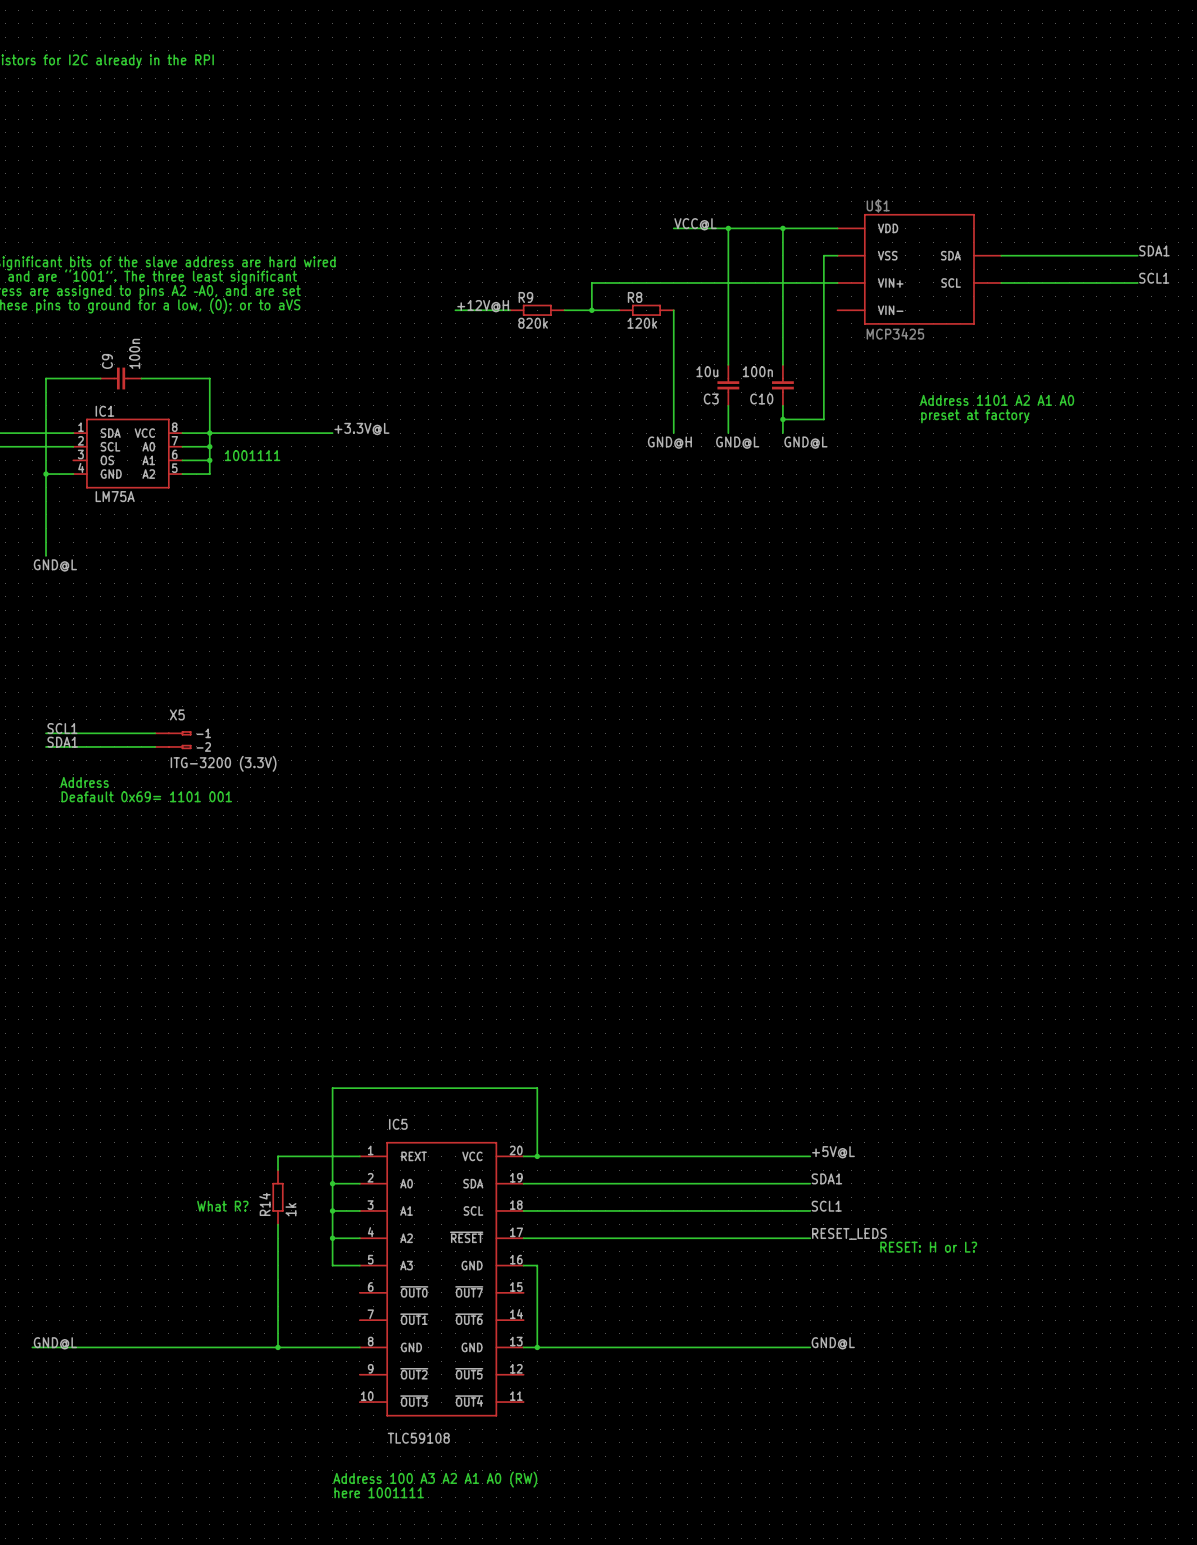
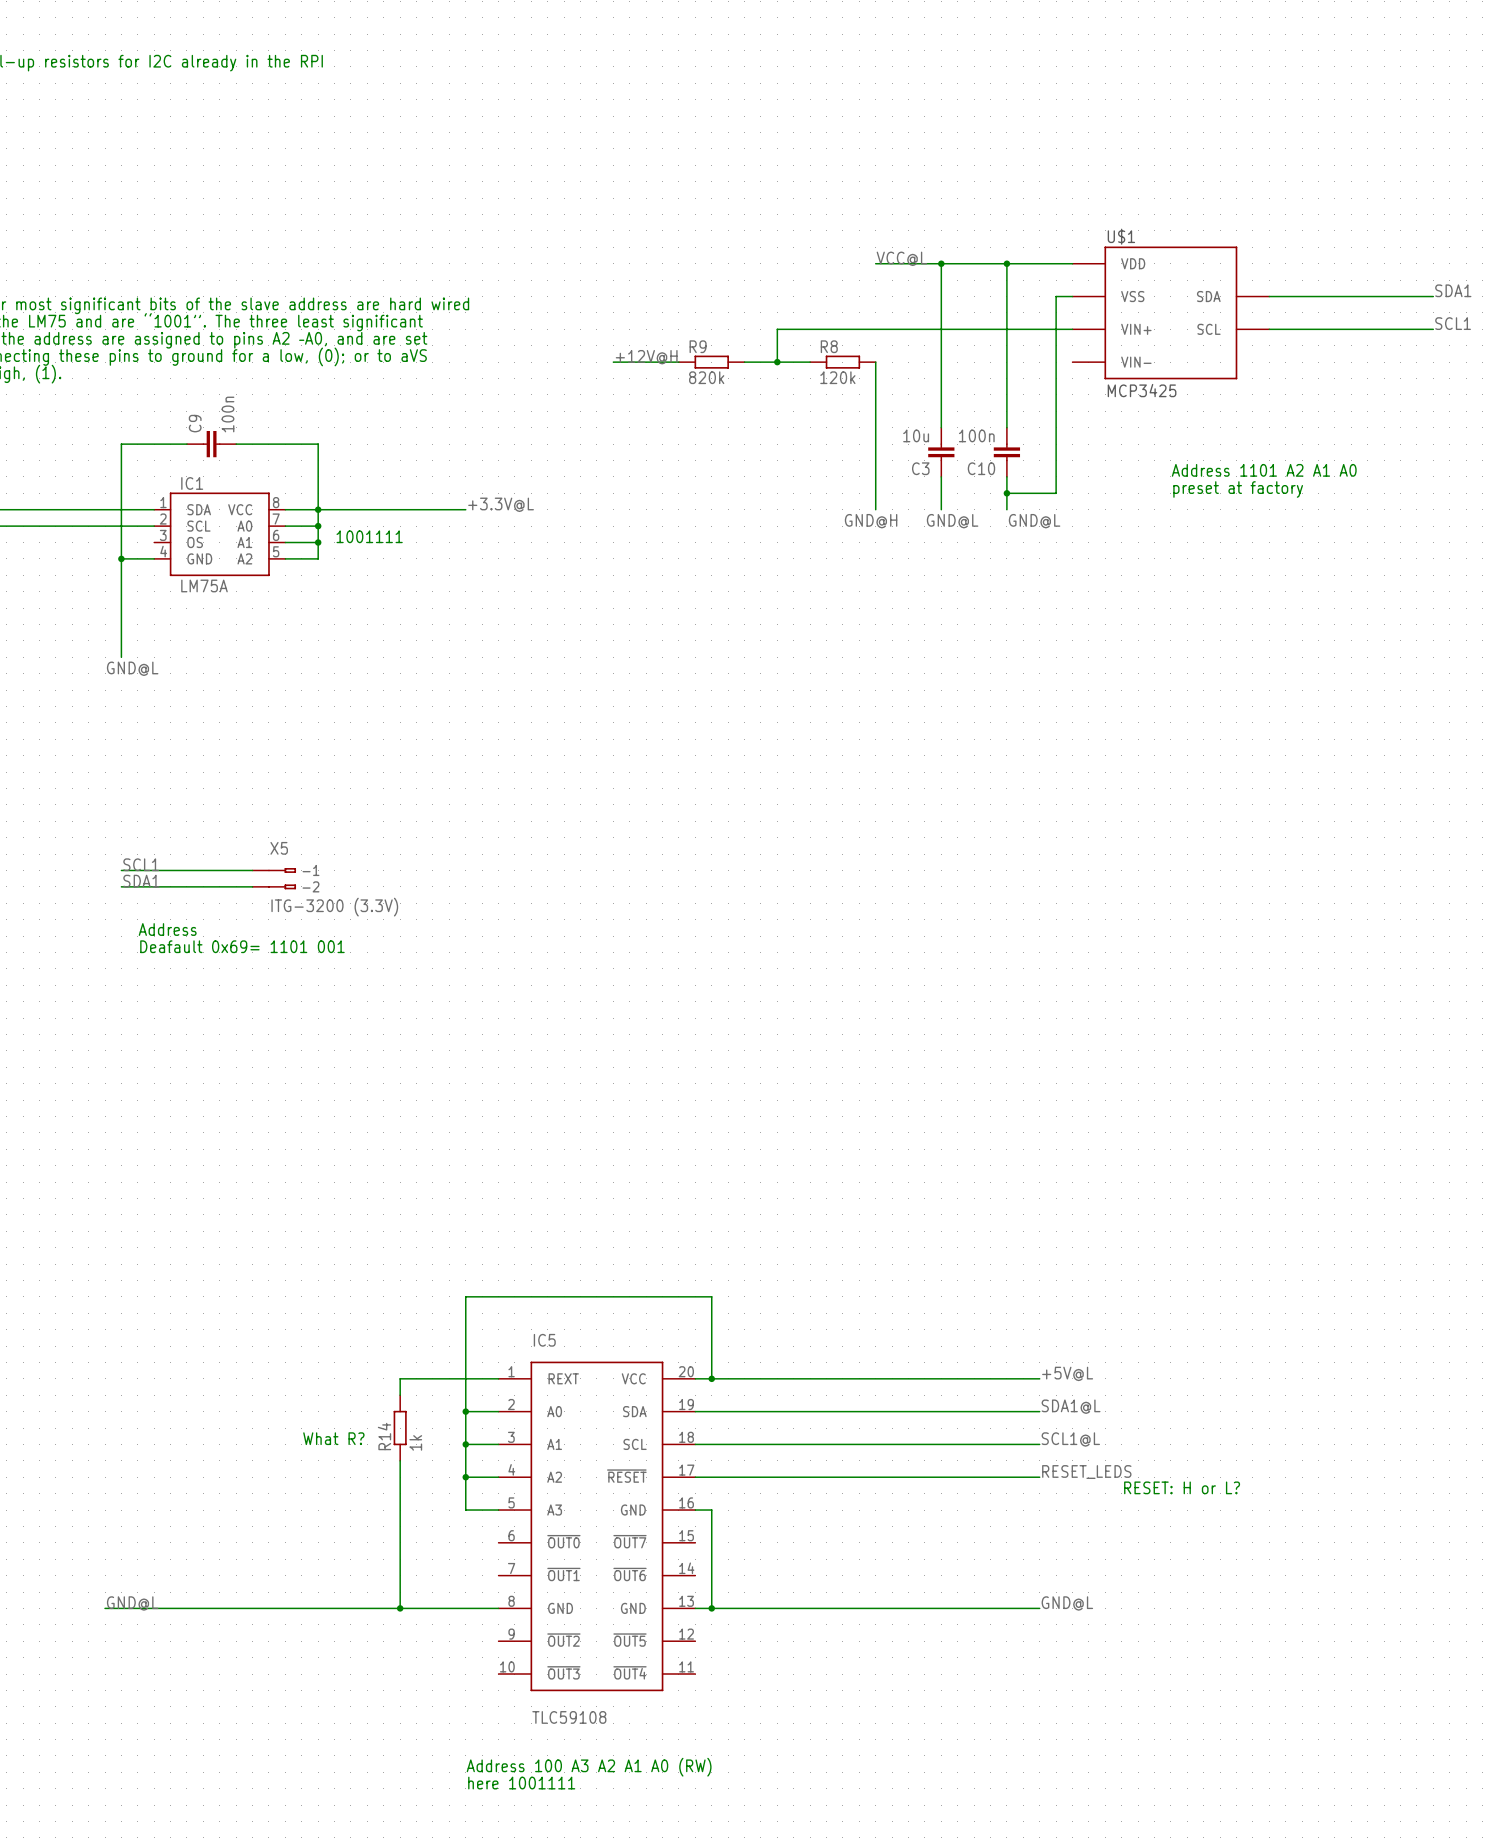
label: SDA1 (826, 1178) -> SDA1@L (1071, 1406)
label: SCL1 (826, 1206) -> SCL1@L (1070, 1439)

